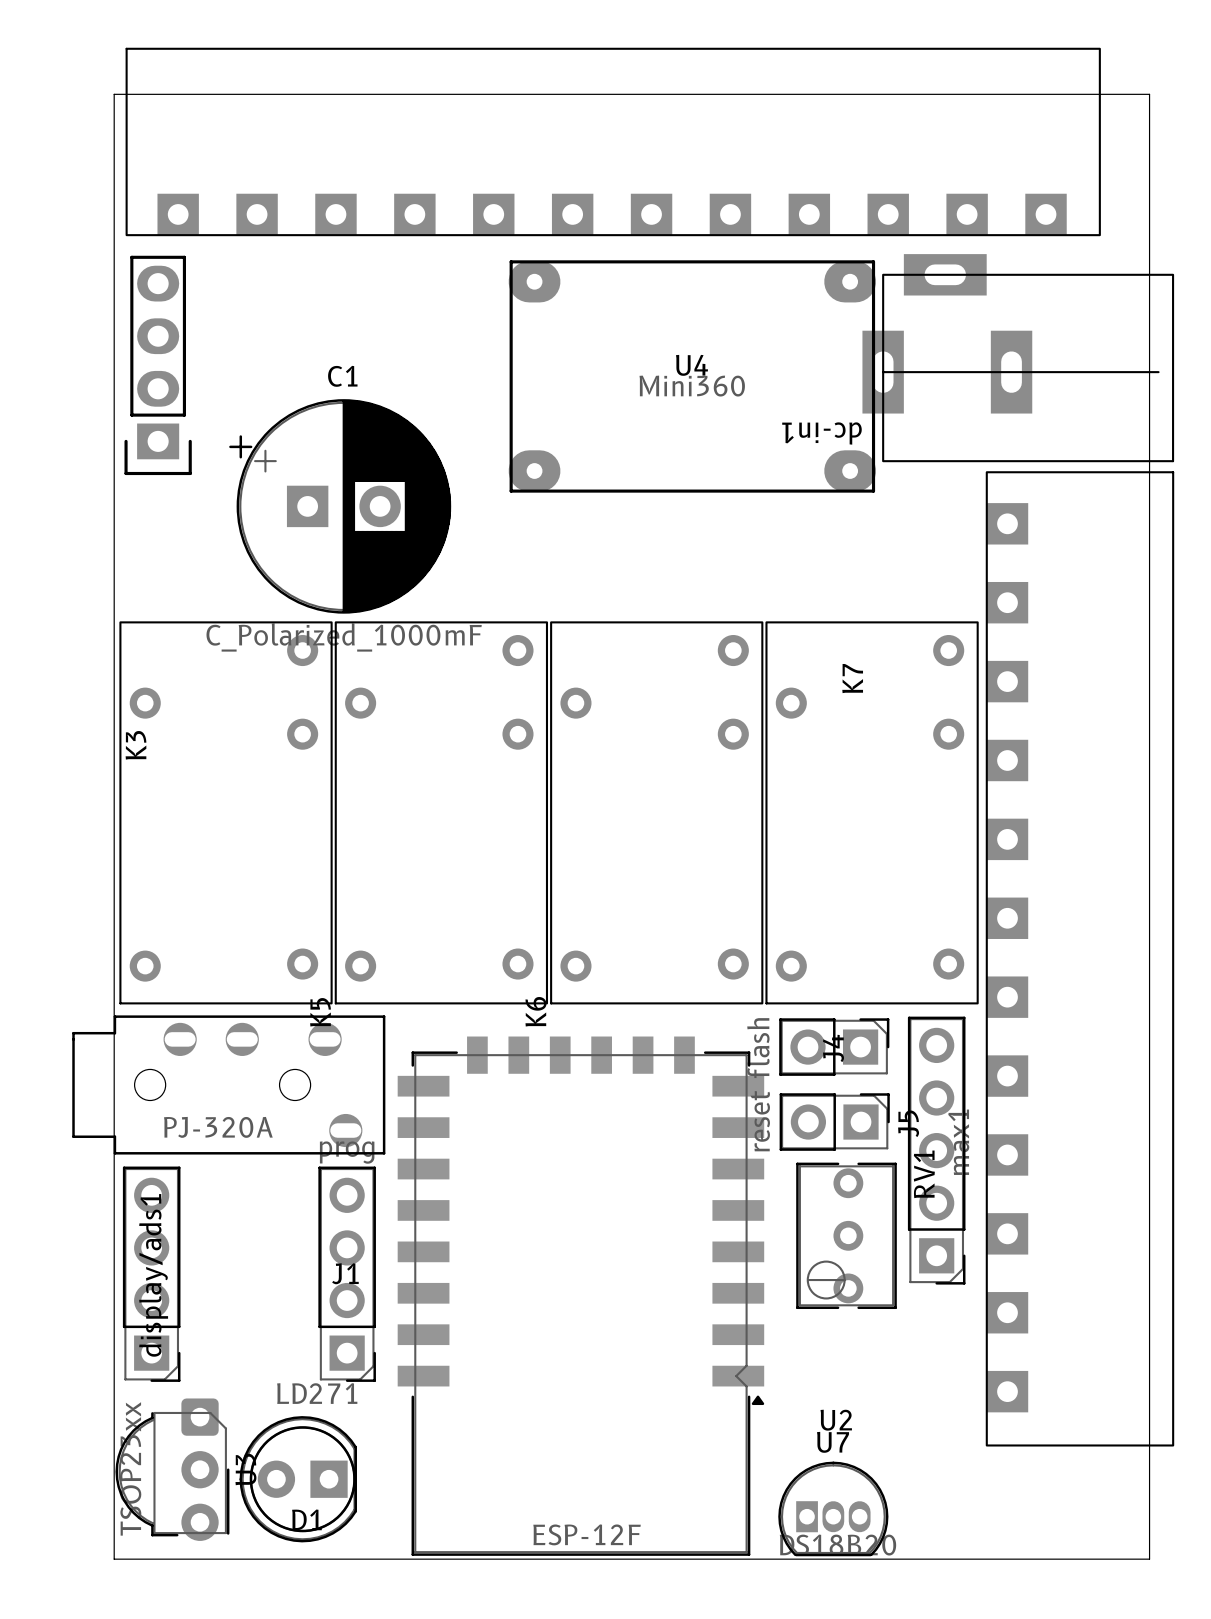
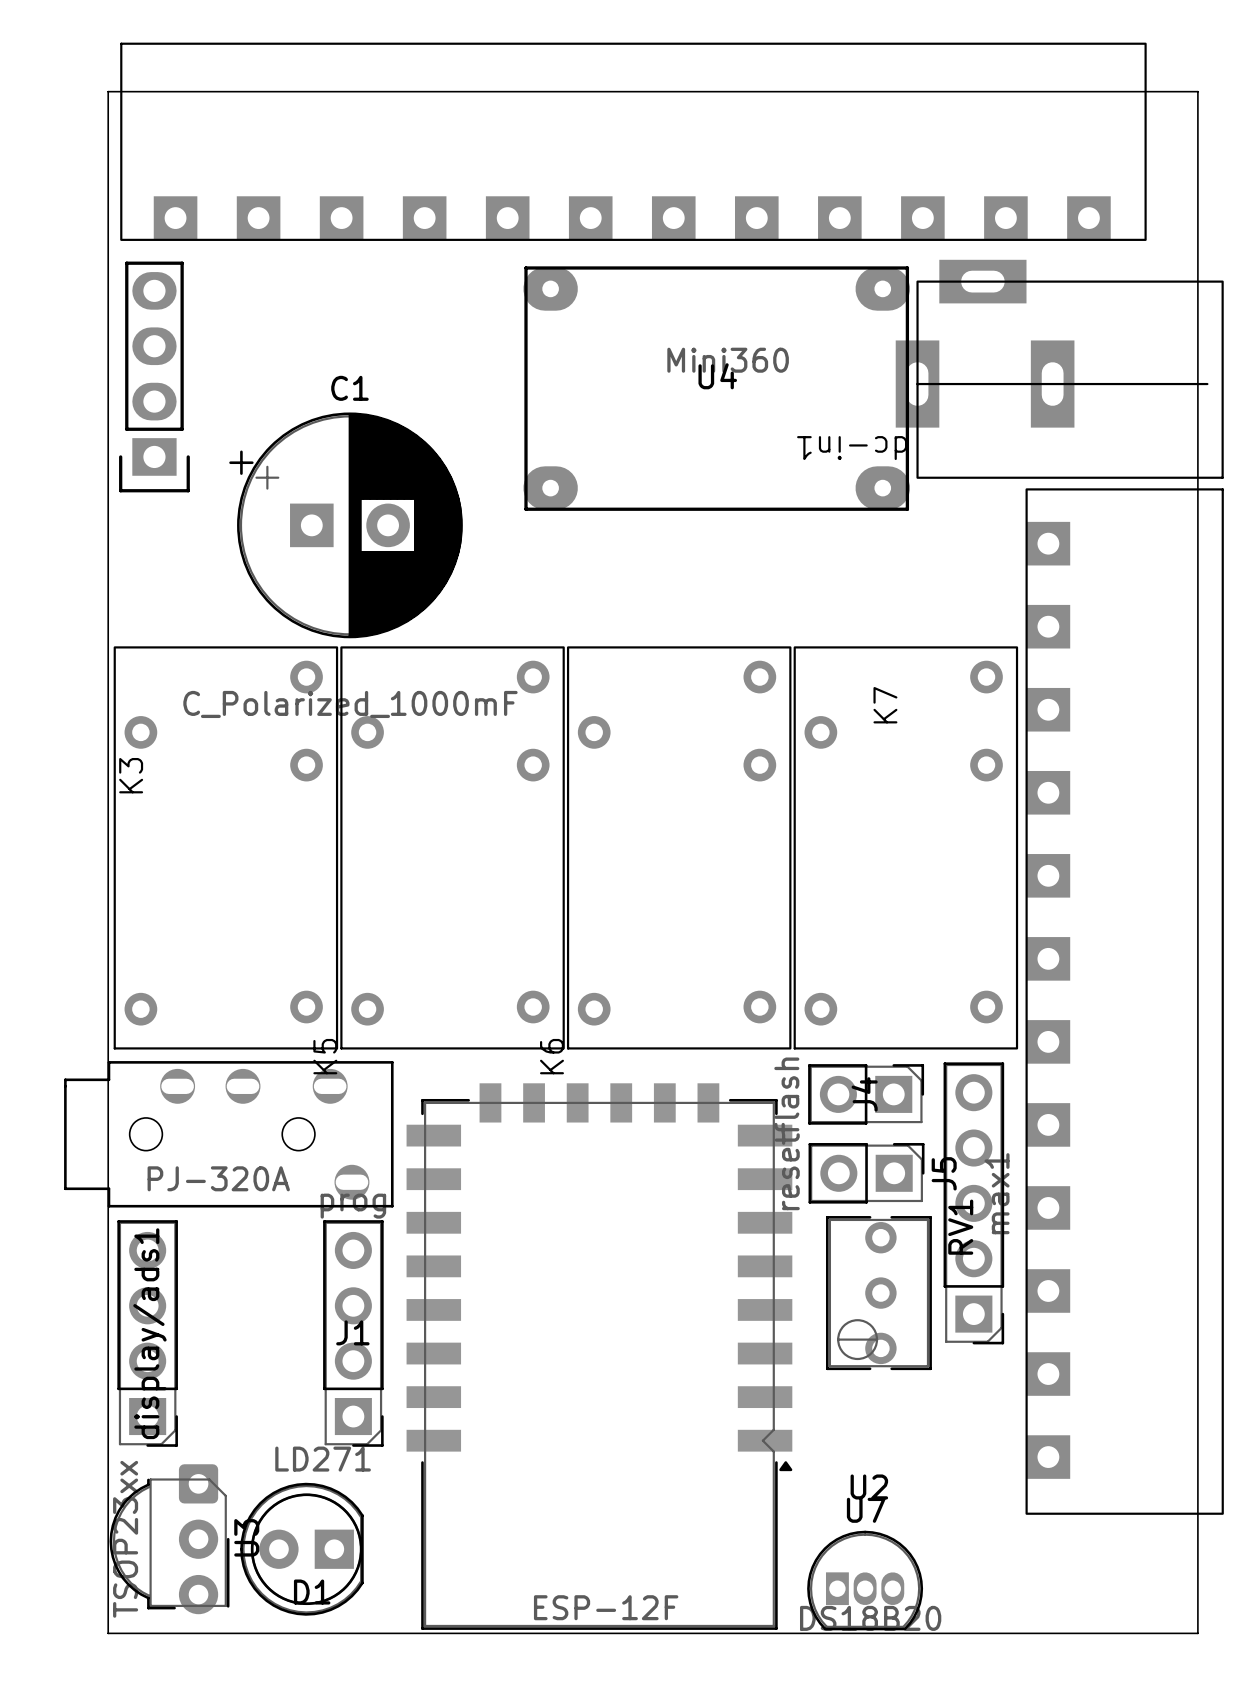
U4 value position: Mini360 (692, 386) -> Mini360 (728, 360)
C1 value position: C_Polarized_1000mF (344, 637) -> C_Polarized_1000mF (350, 704)

